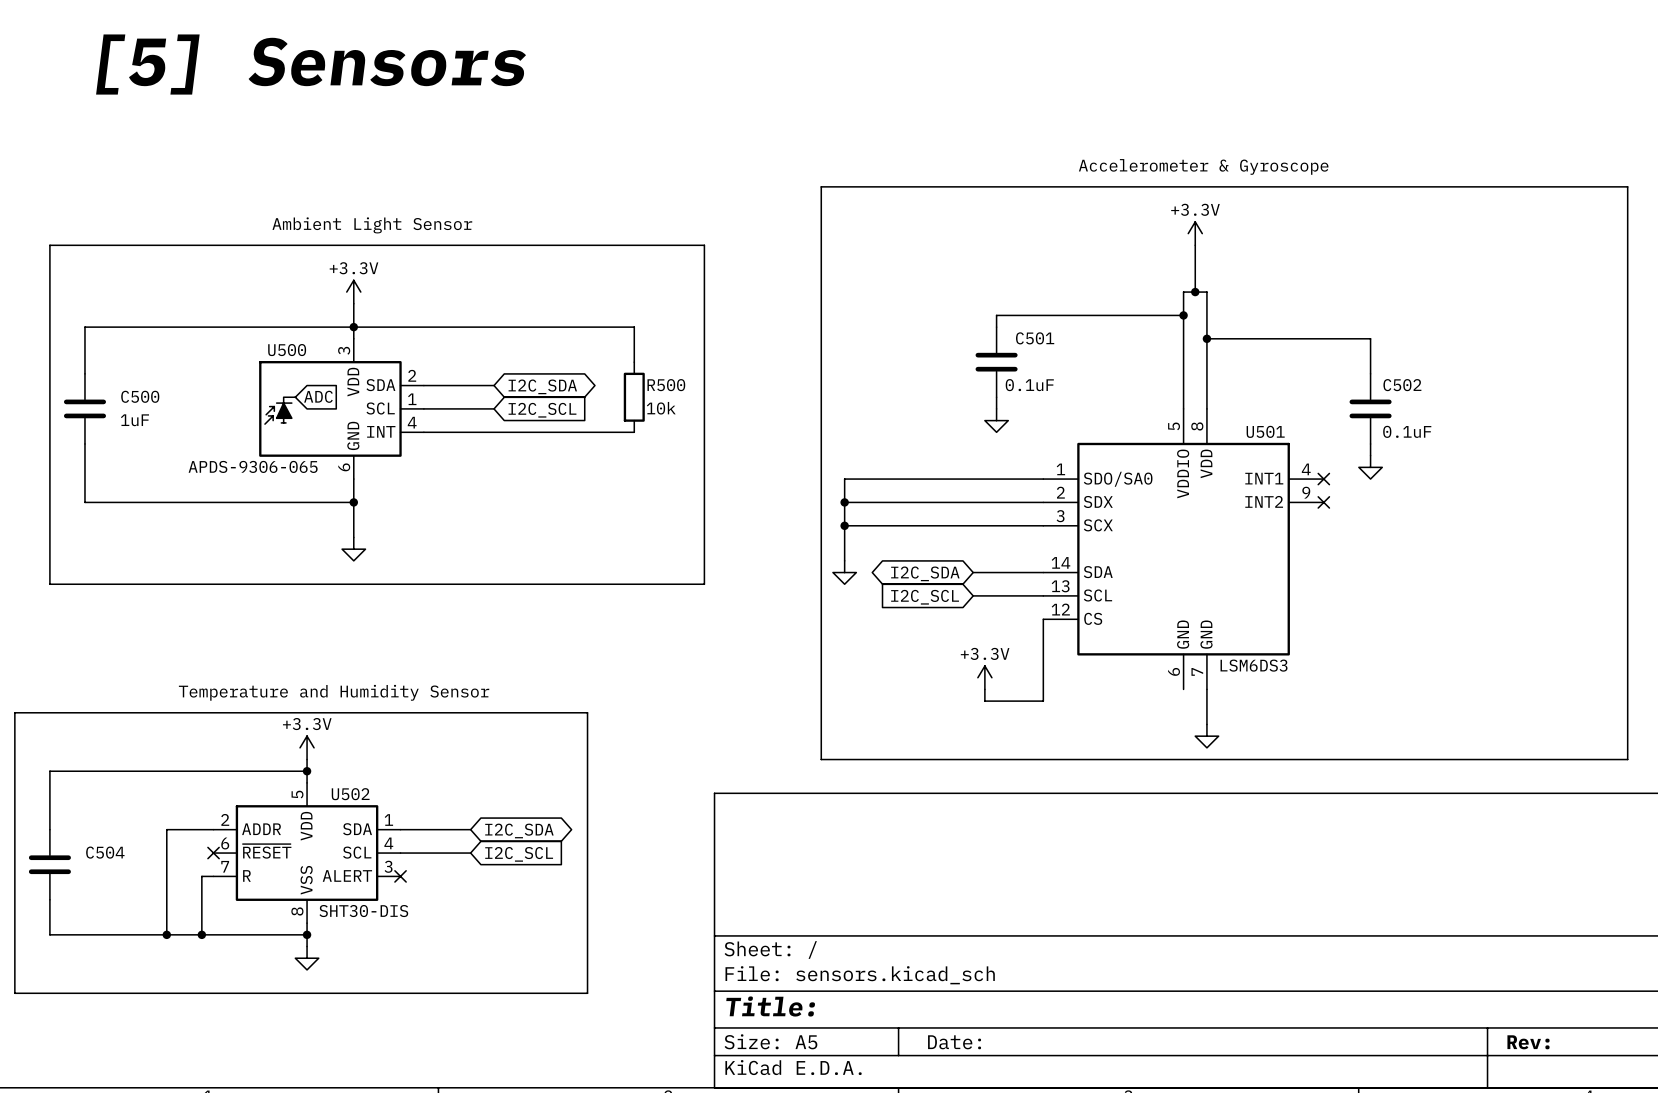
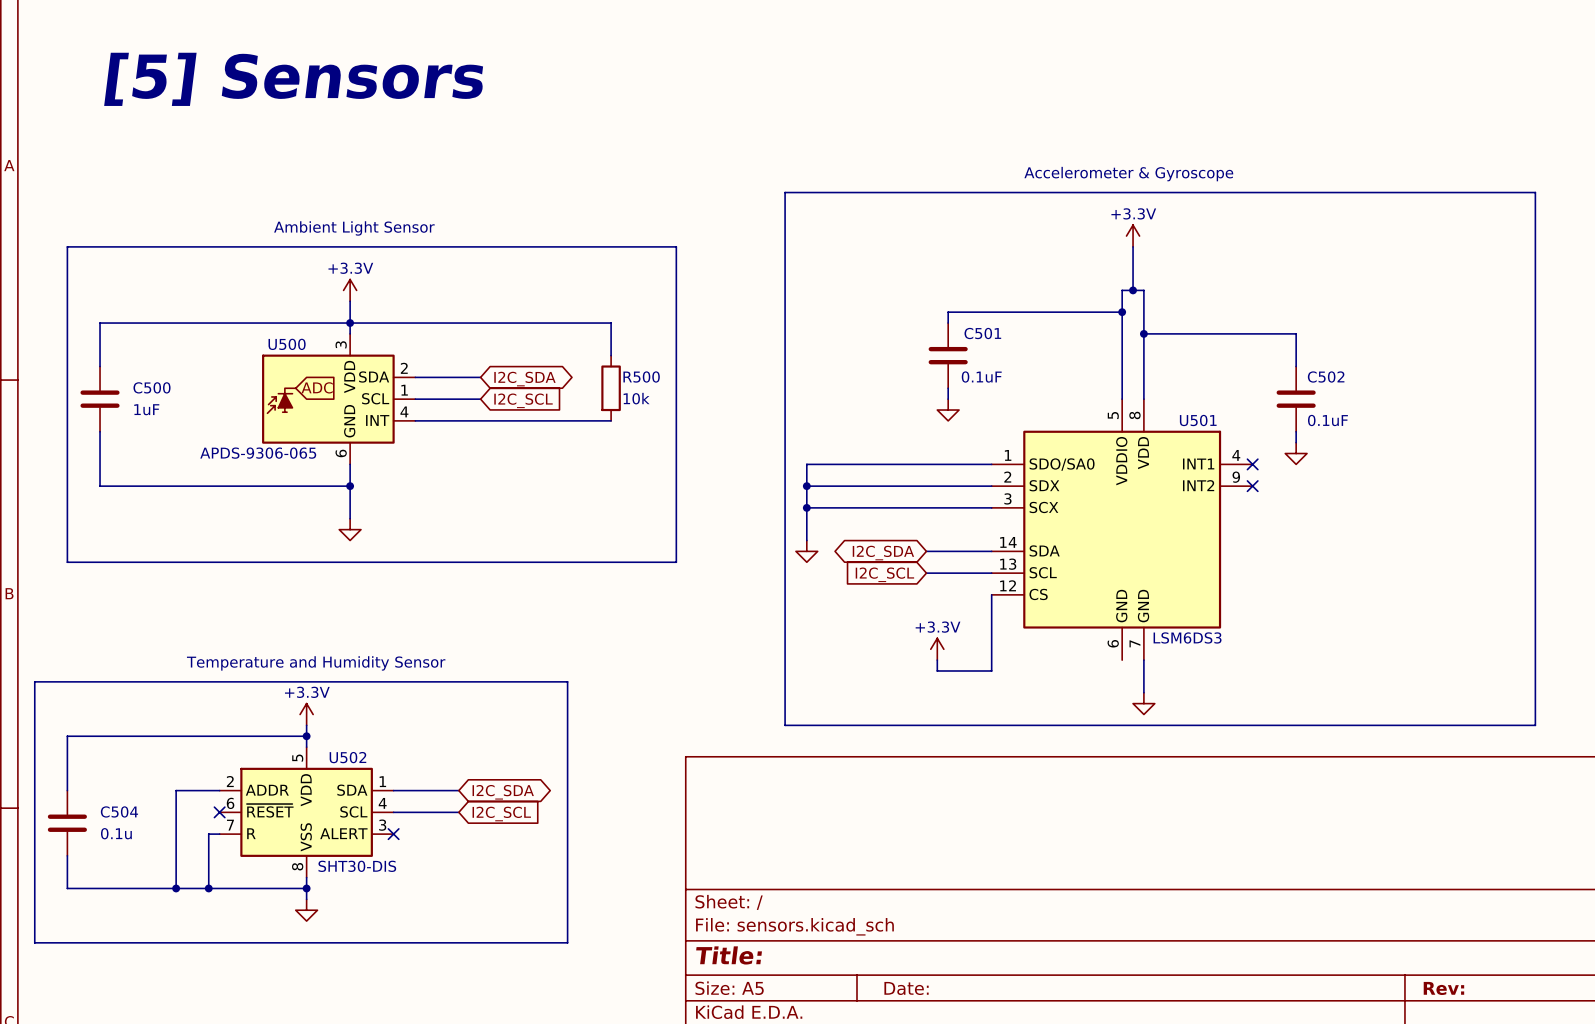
C504 value: none -> 0.1u (116, 833)

